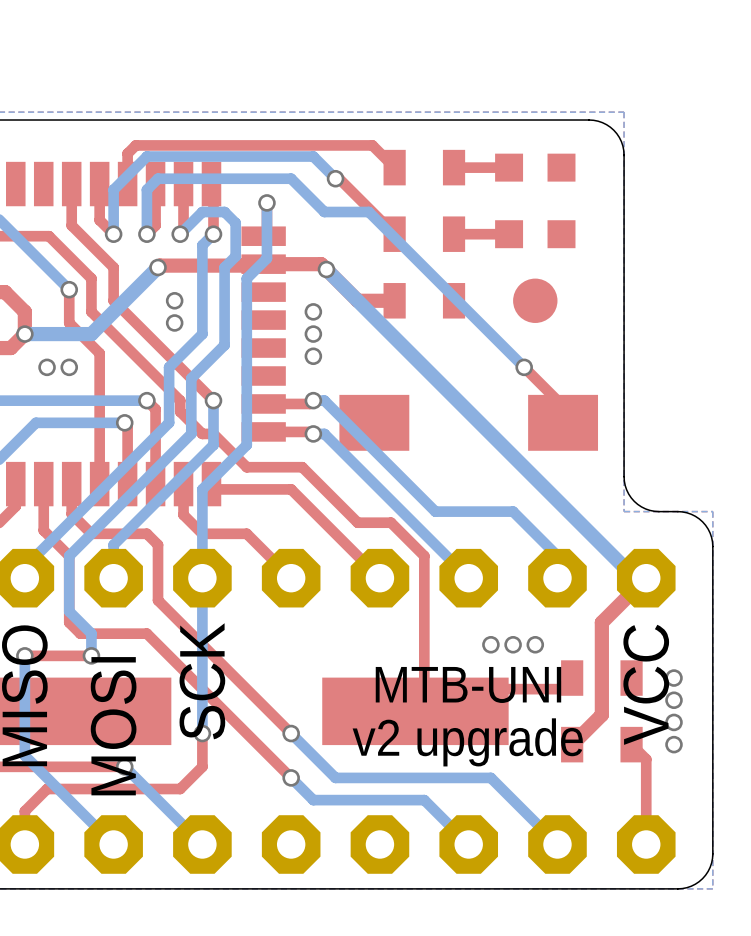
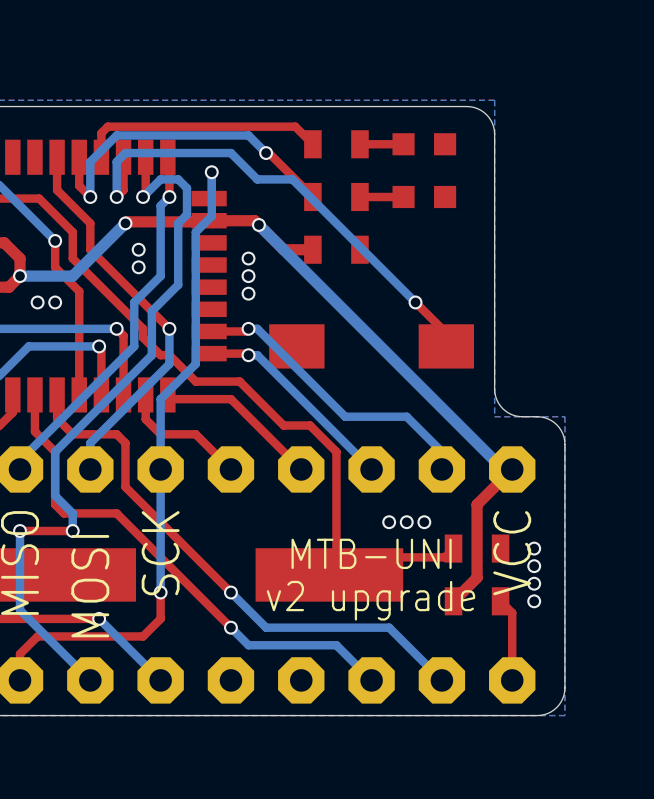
part: (535, 300) -> none

